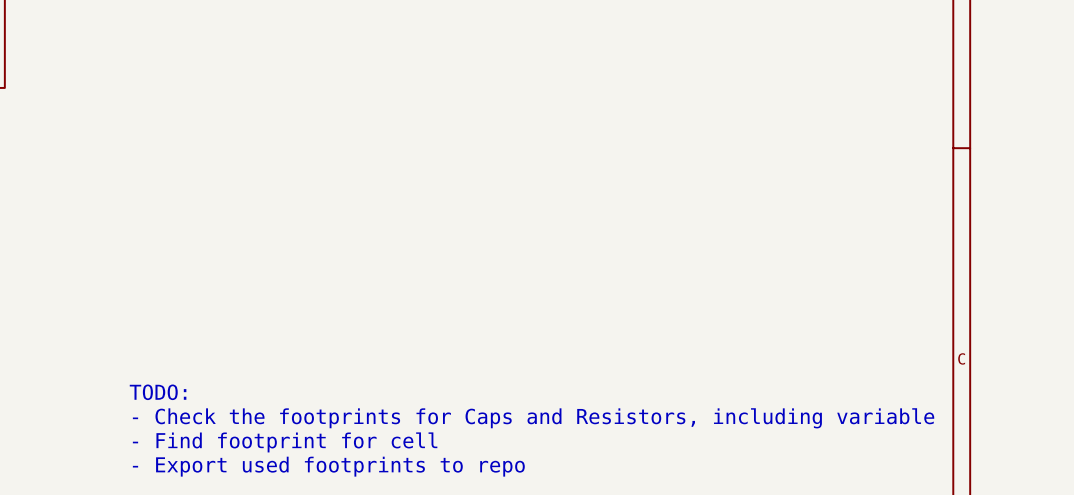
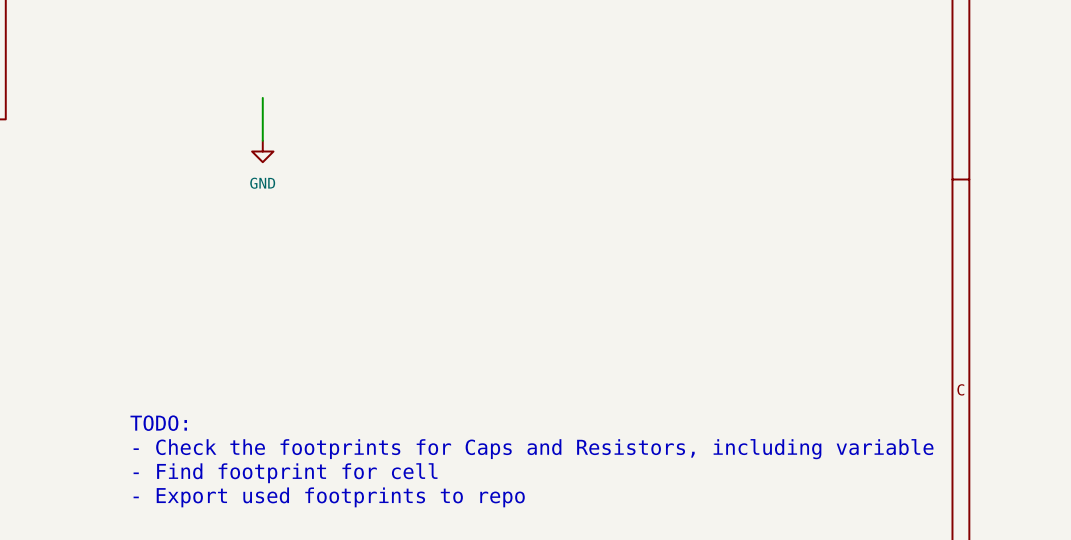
wire: none -> (262, 97) (262, 140)
power symbol: none -> GND (262, 151)

